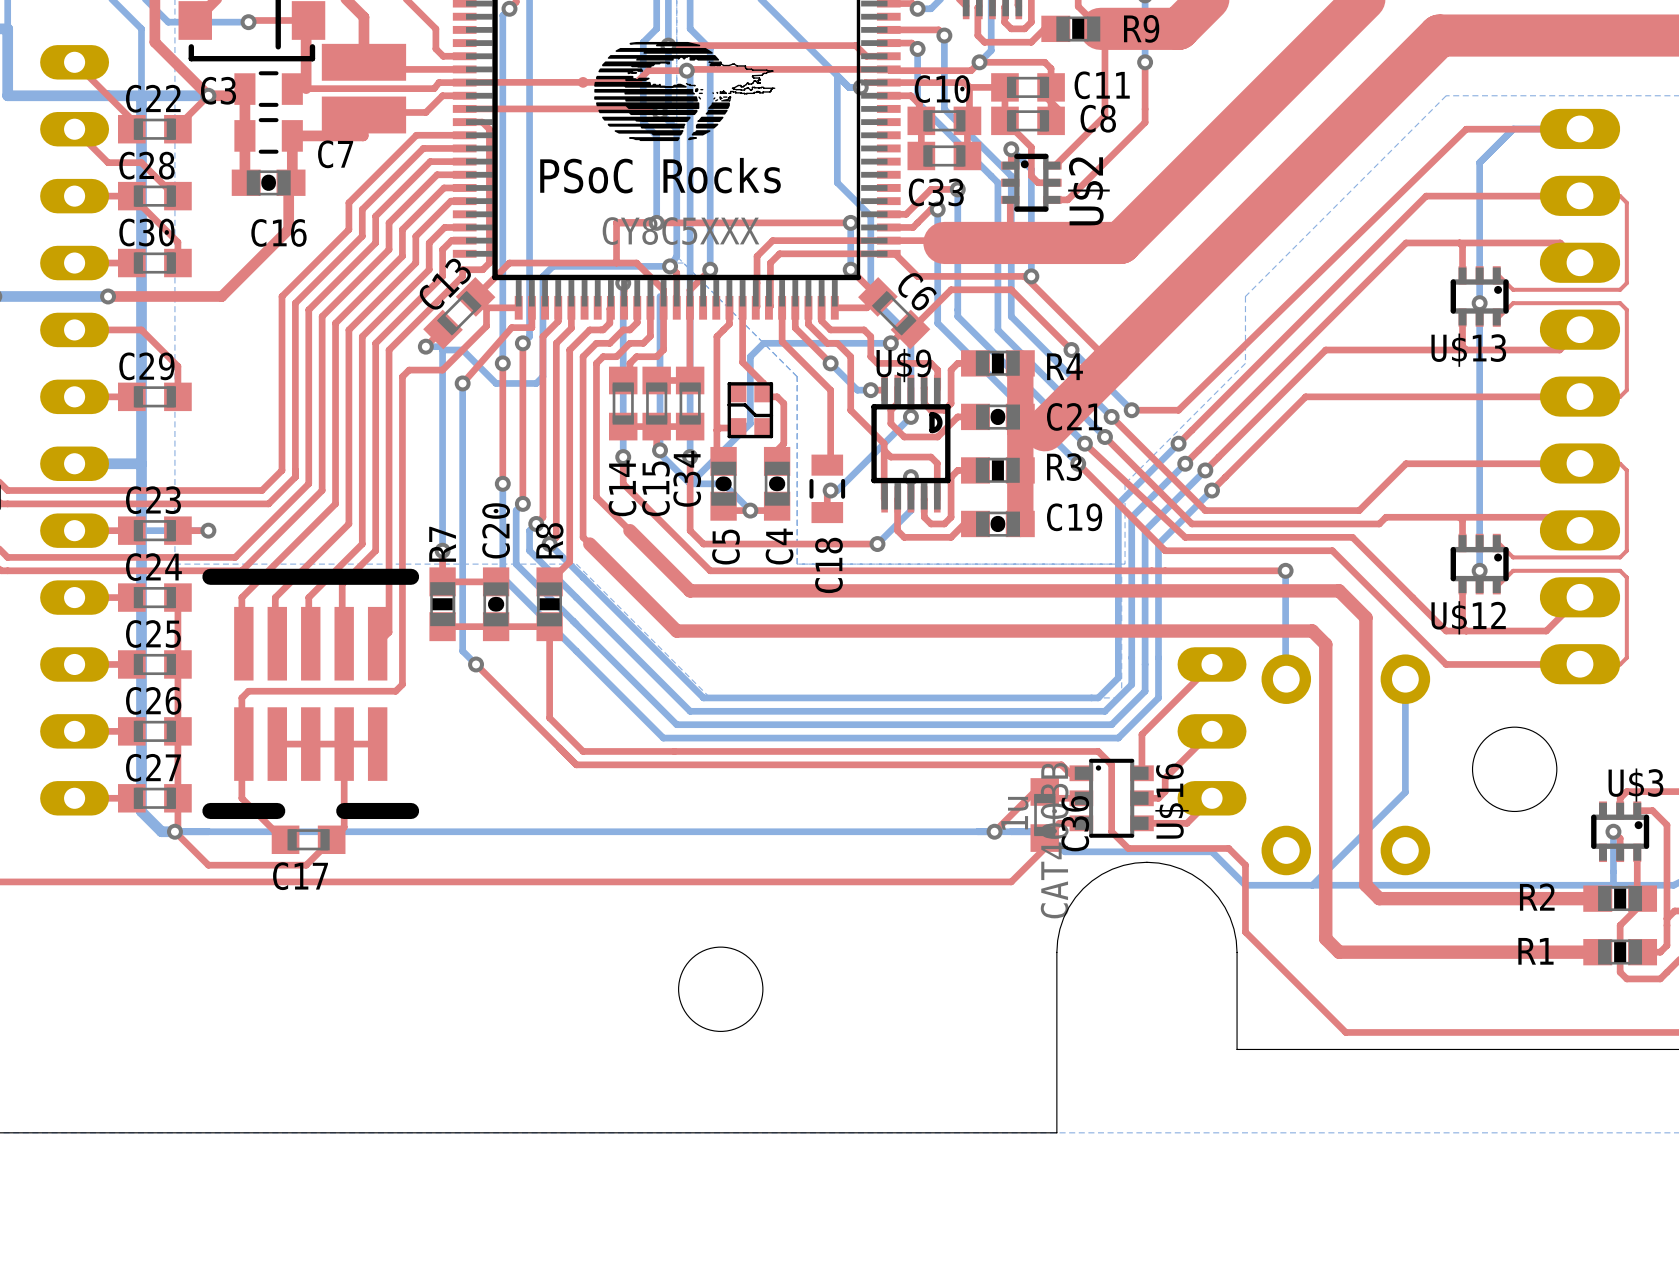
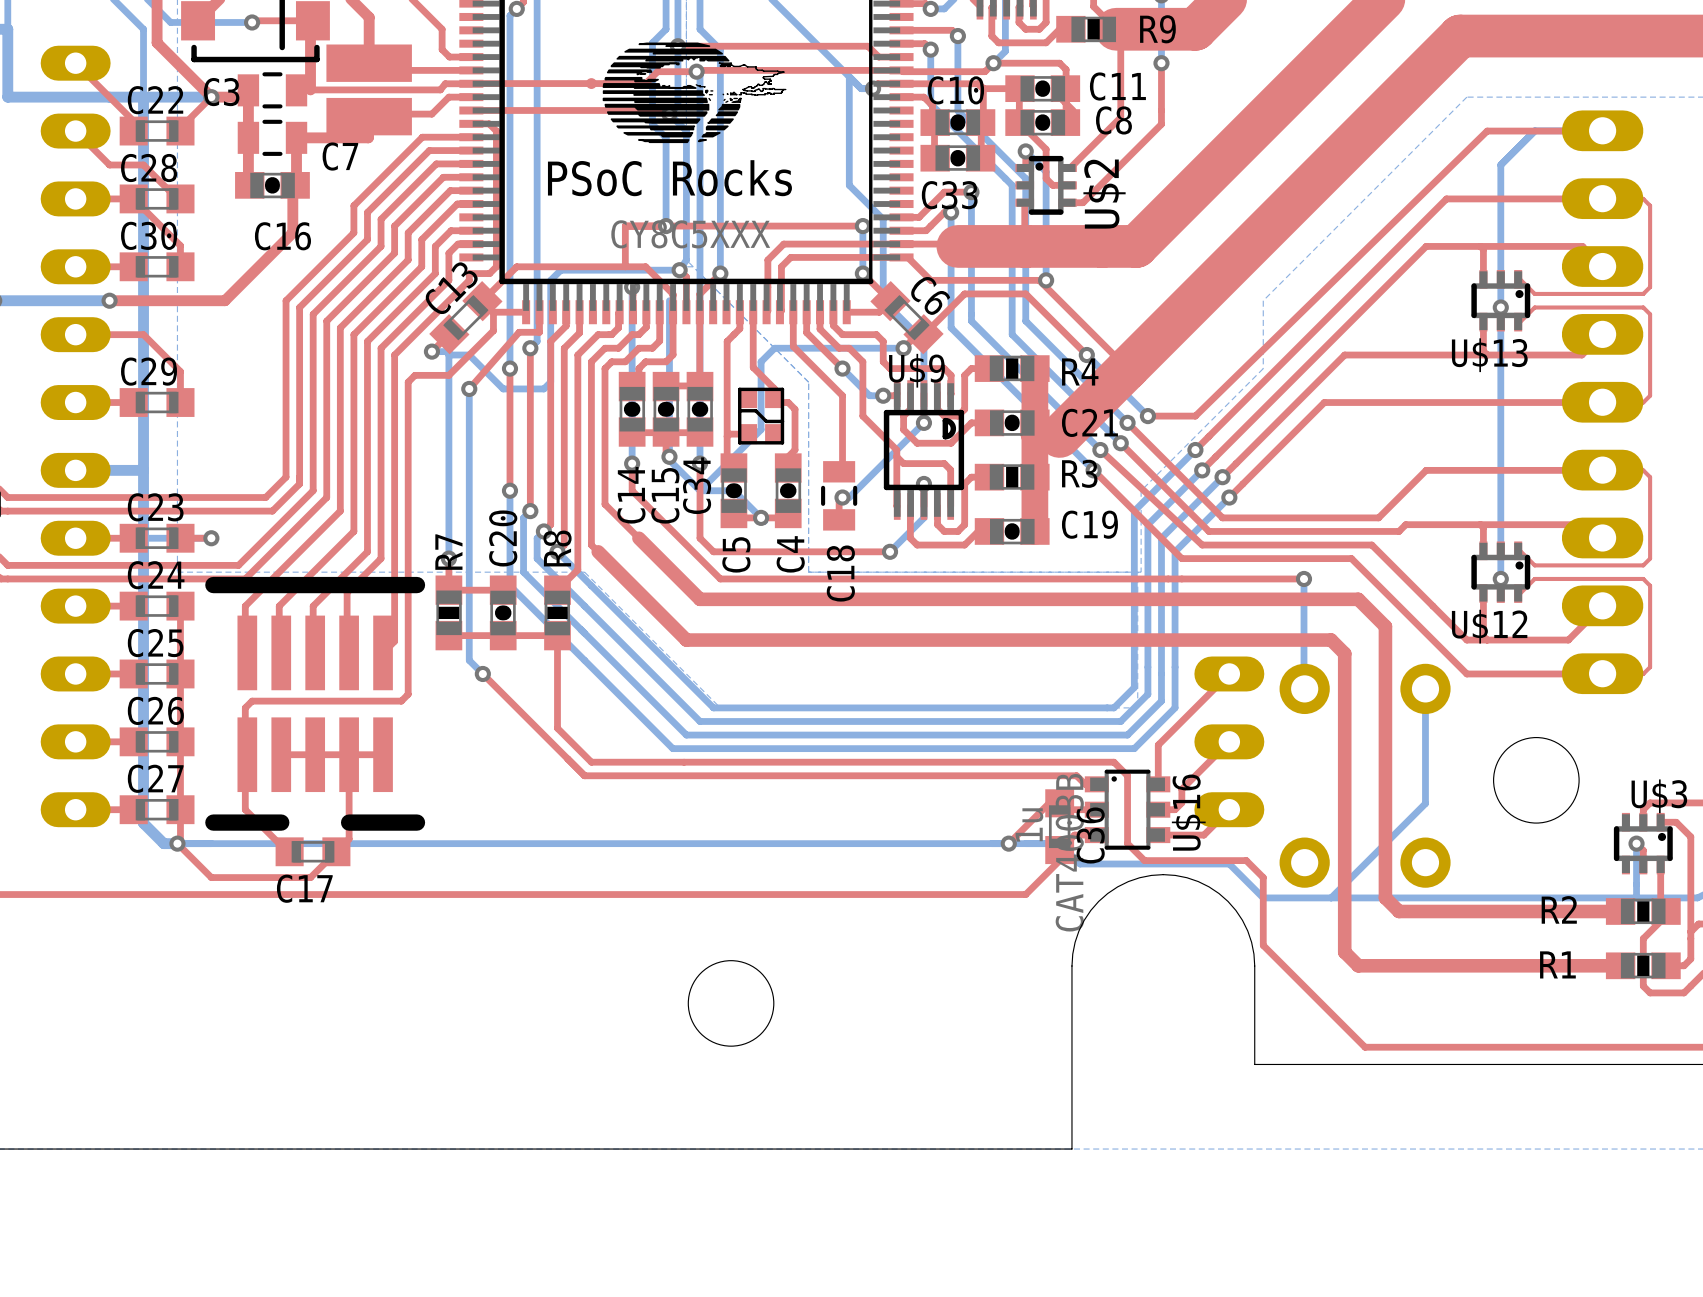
C11 footprint: [991, 73, 1065, 102] -> [1005, 75, 1081, 103]
C10 footprint: [907, 106, 982, 136] -> [920, 109, 996, 136]
C8 footprint: [991, 106, 1065, 136] -> [1005, 109, 1081, 136]
C33 footprint: [907, 141, 982, 171] -> [920, 144, 996, 172]
C14 footprint: [609, 366, 638, 441] -> [618, 371, 646, 447]
C15 footprint: [642, 366, 671, 441] -> [652, 371, 680, 447]
C34 footprint: [675, 366, 705, 441] -> [686, 371, 714, 447]

